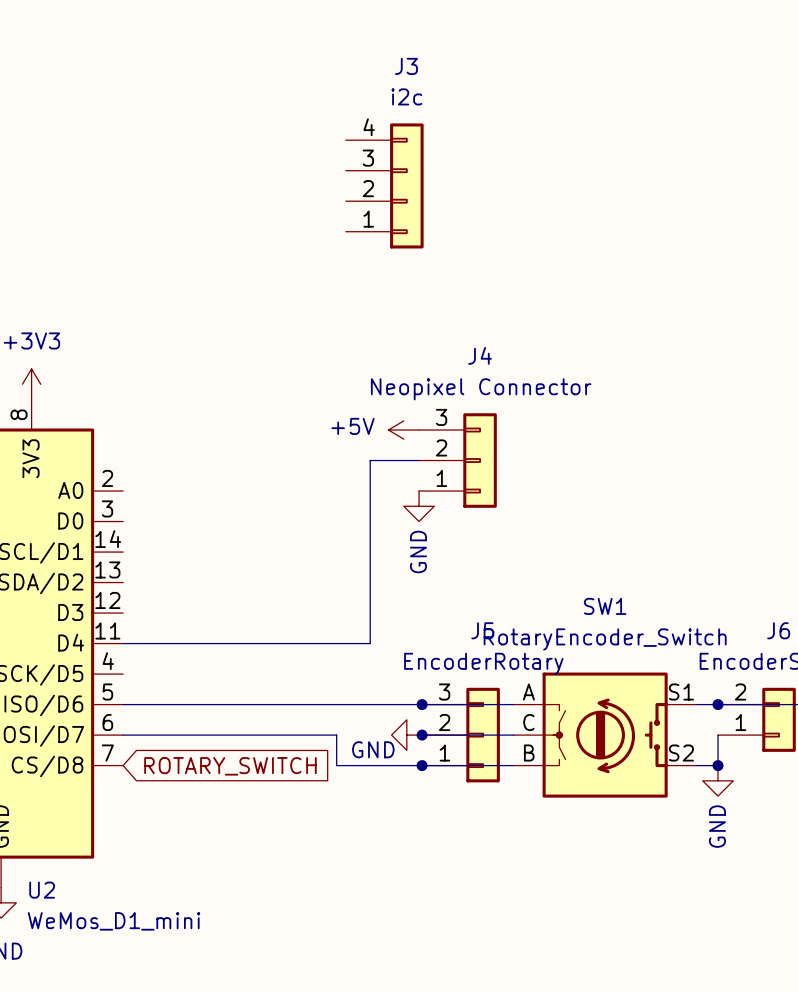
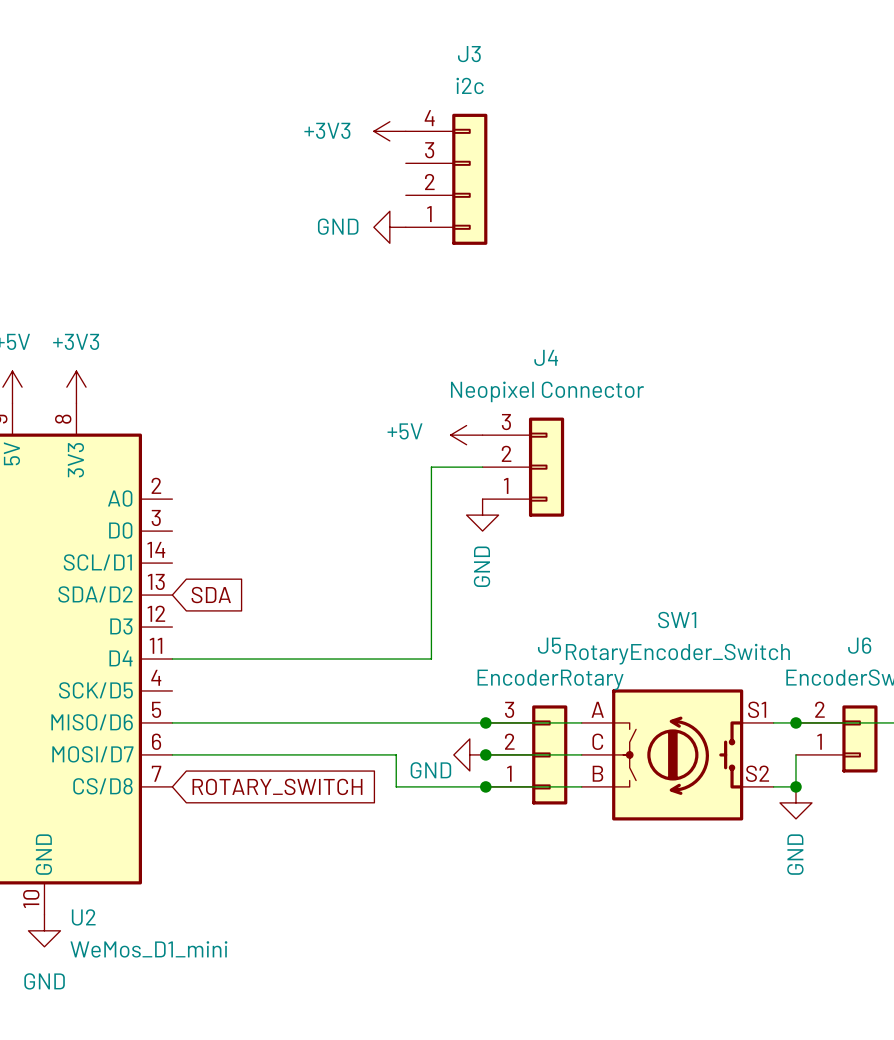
power symbol: none -> +3V3 (389, 131)
power symbol: none -> GND (389, 227)
global label: none -> SDA (211, 595)

